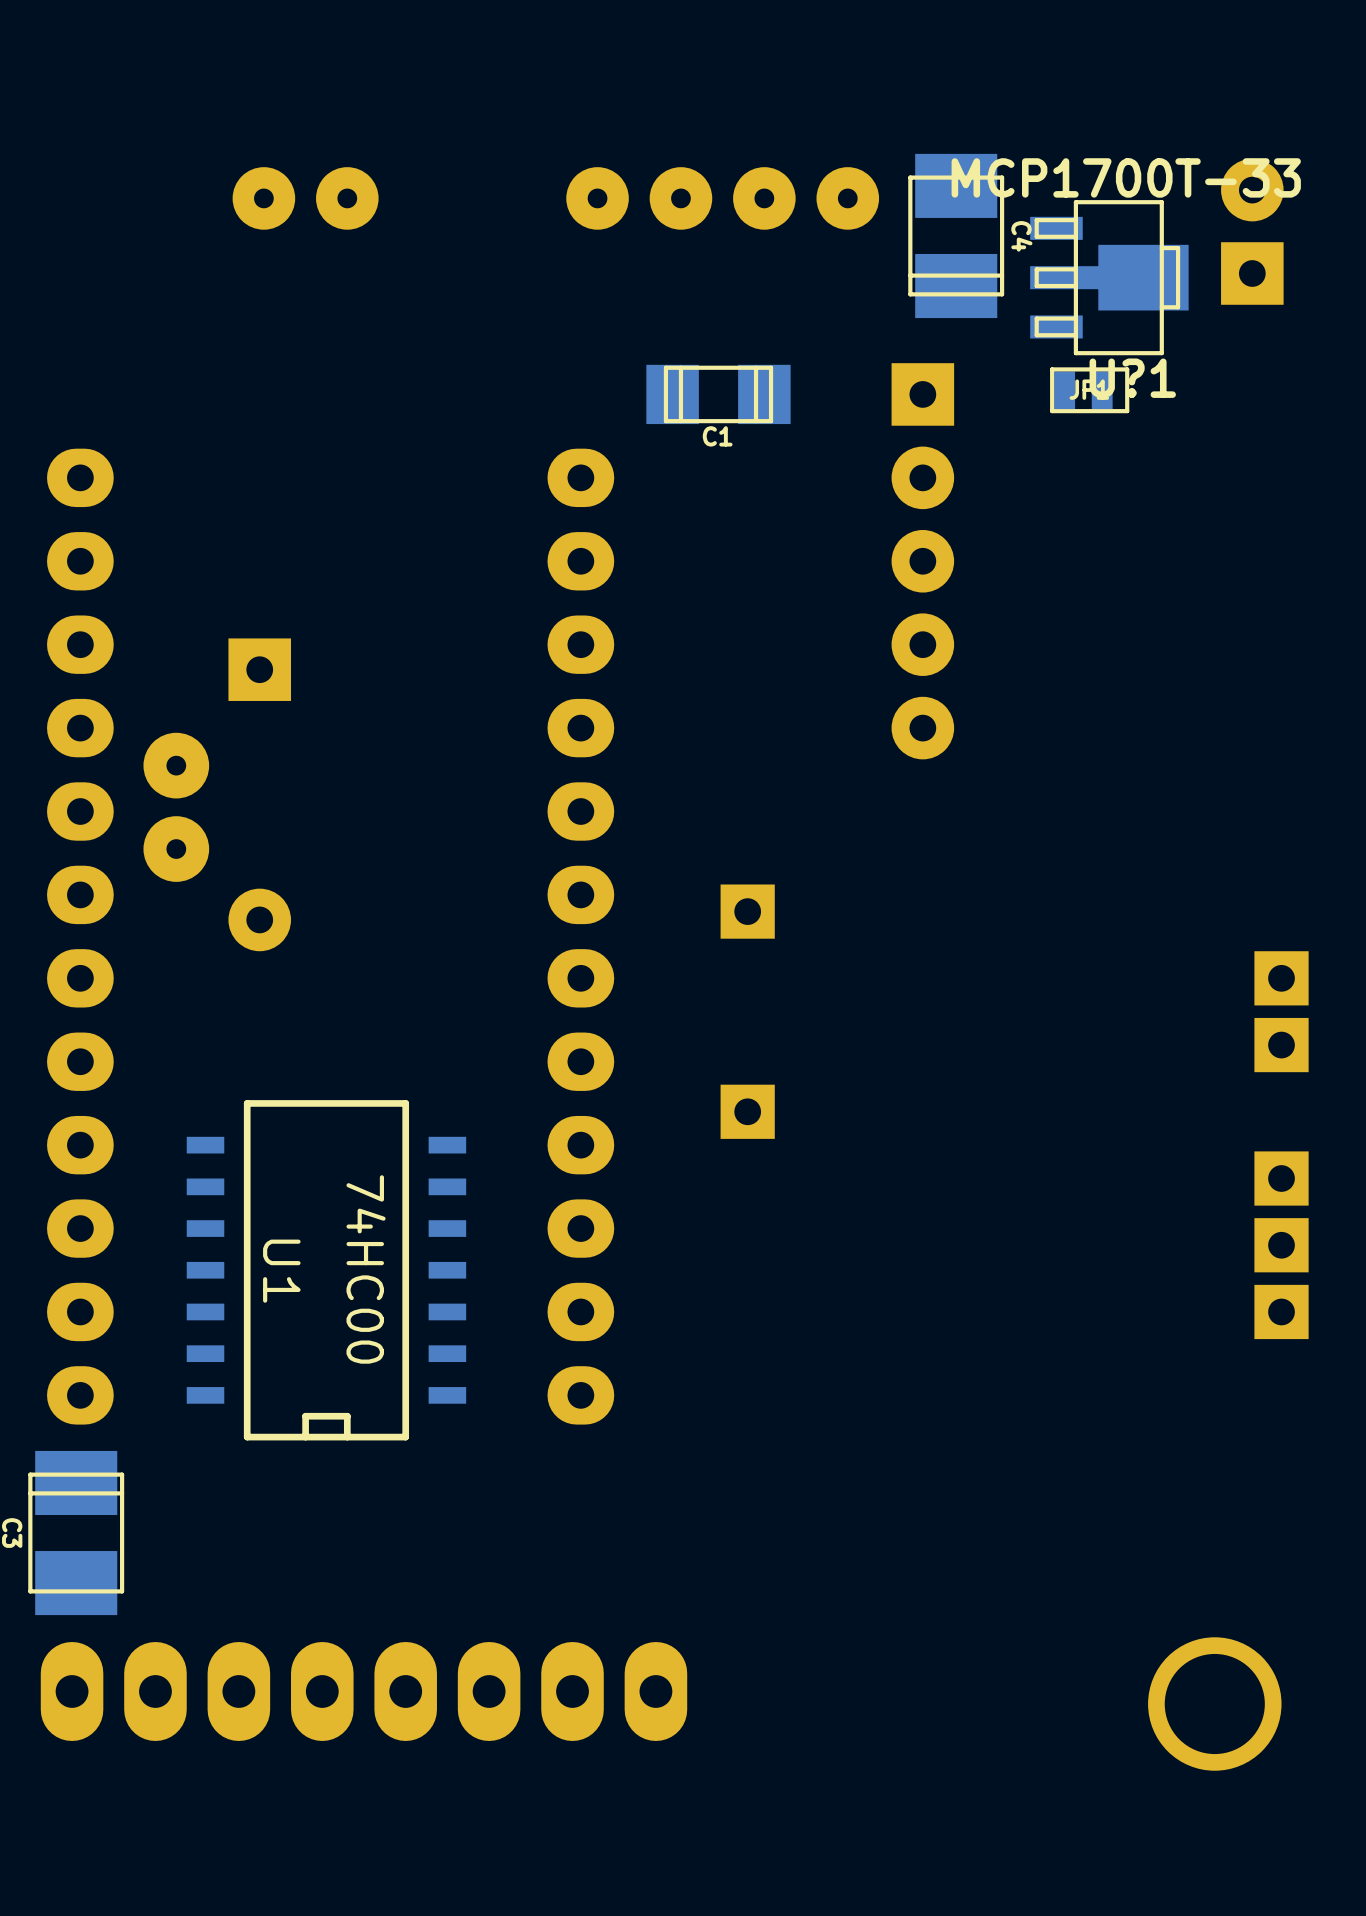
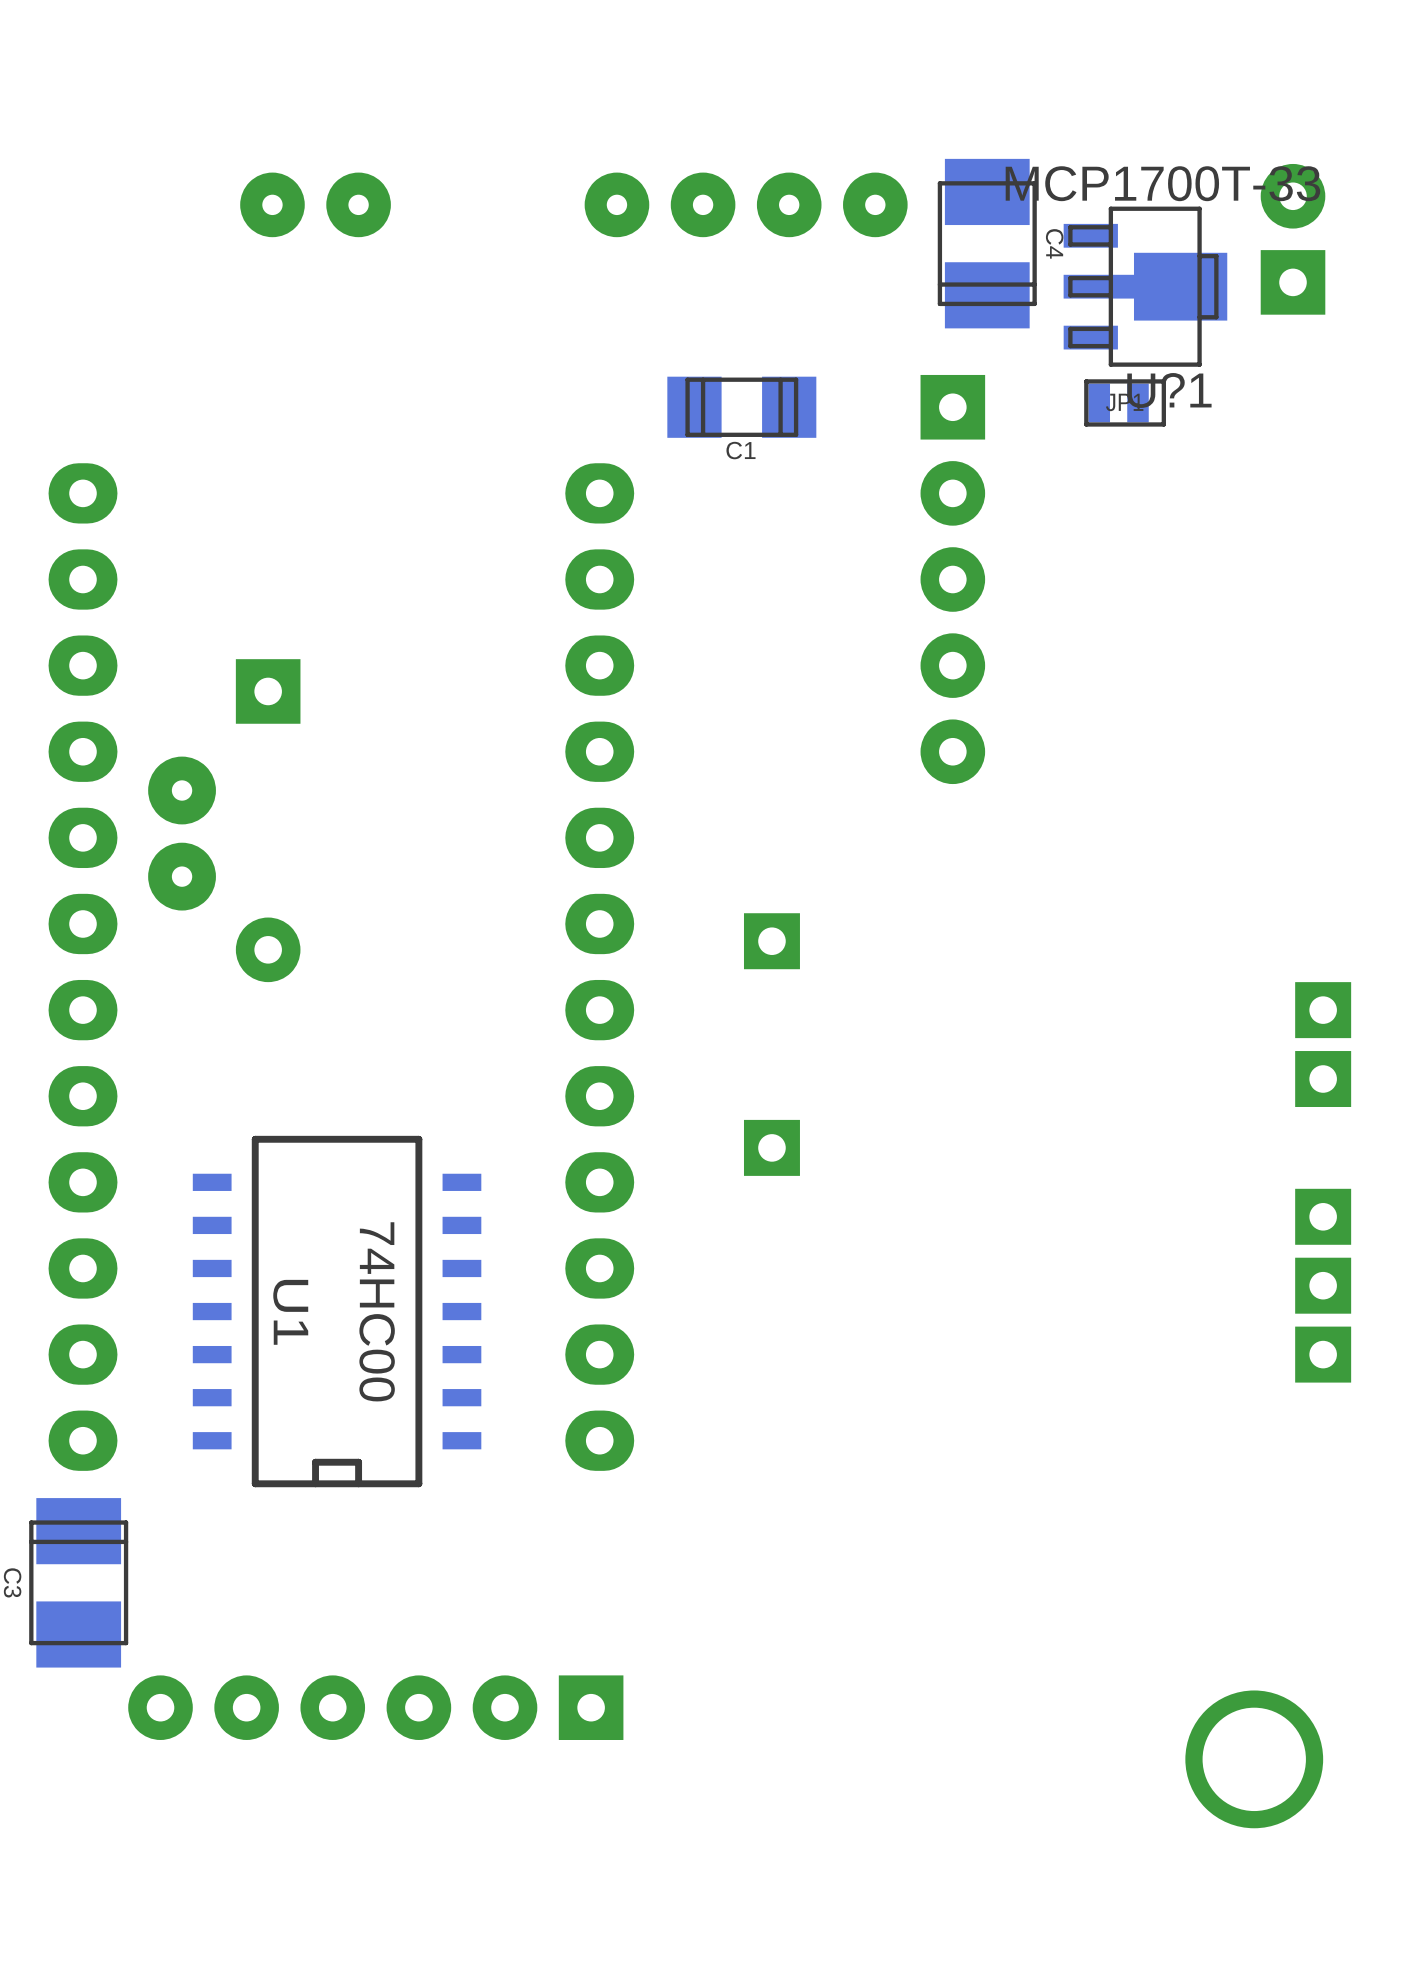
part: none -> (375, 1707)
part: (363, 1691) -> none

